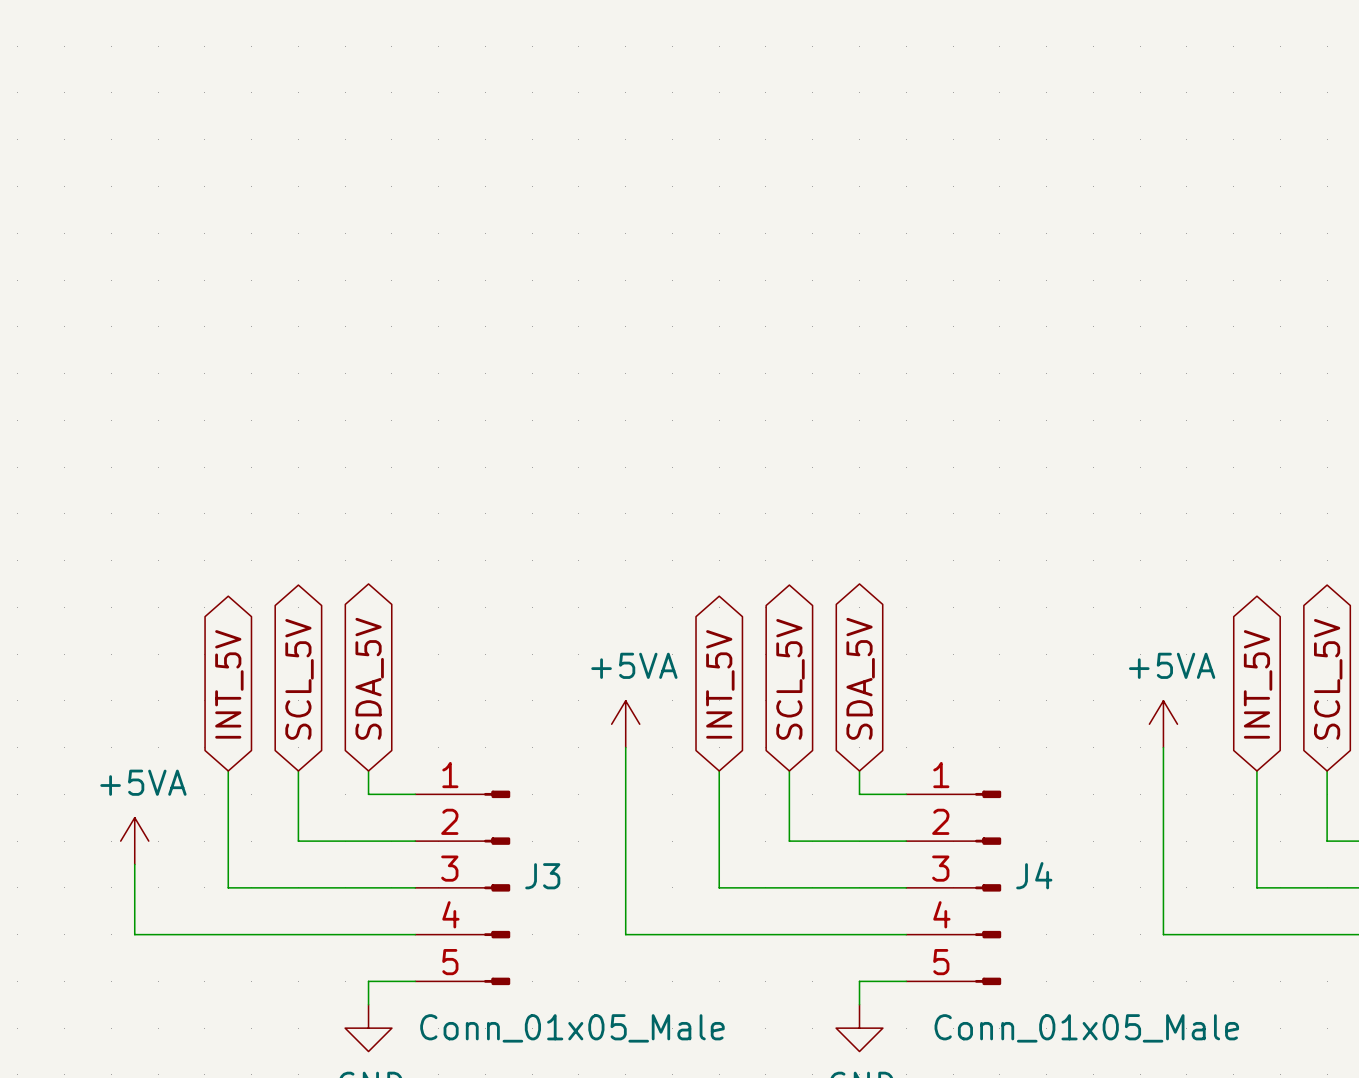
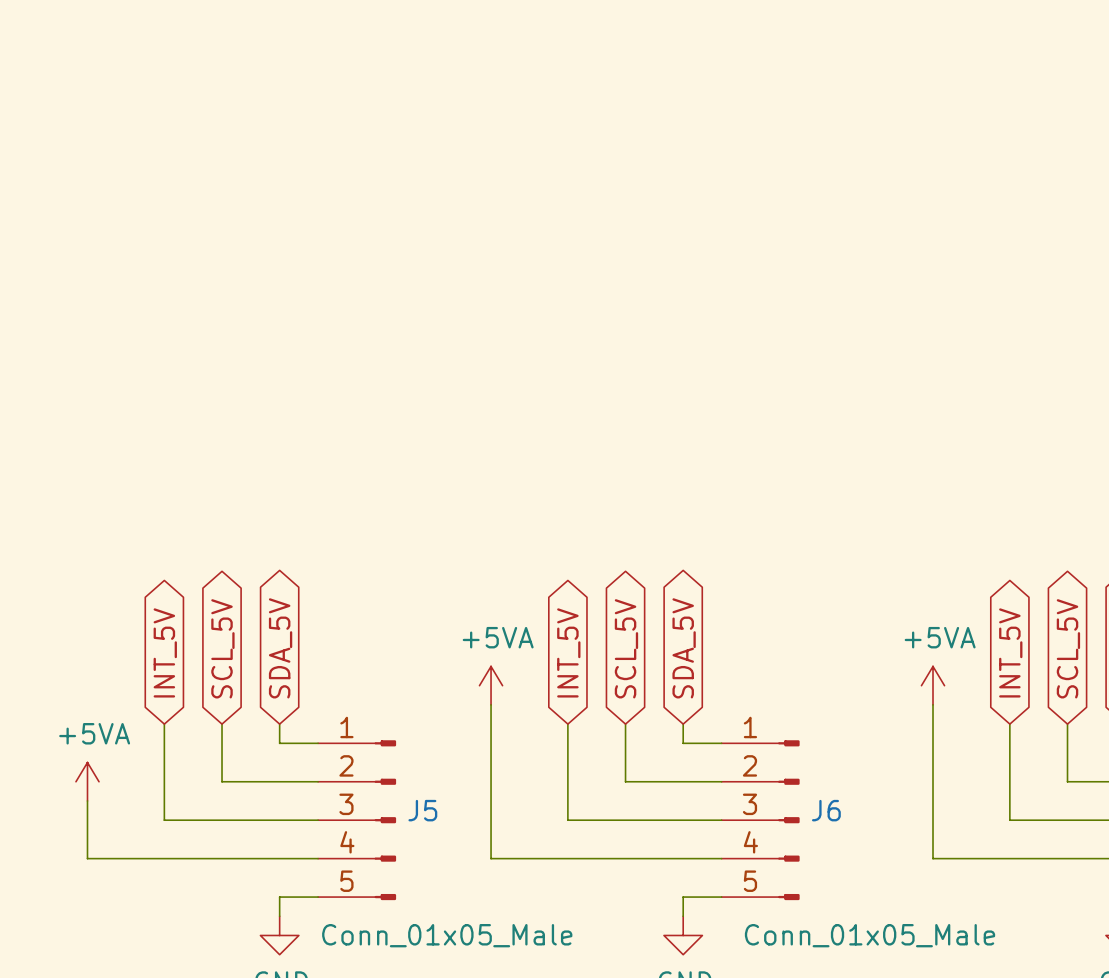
J4 name: J4 (1034, 875) -> J6 (826, 810)
J3 name: J3 (542, 876) -> J5 (422, 810)

